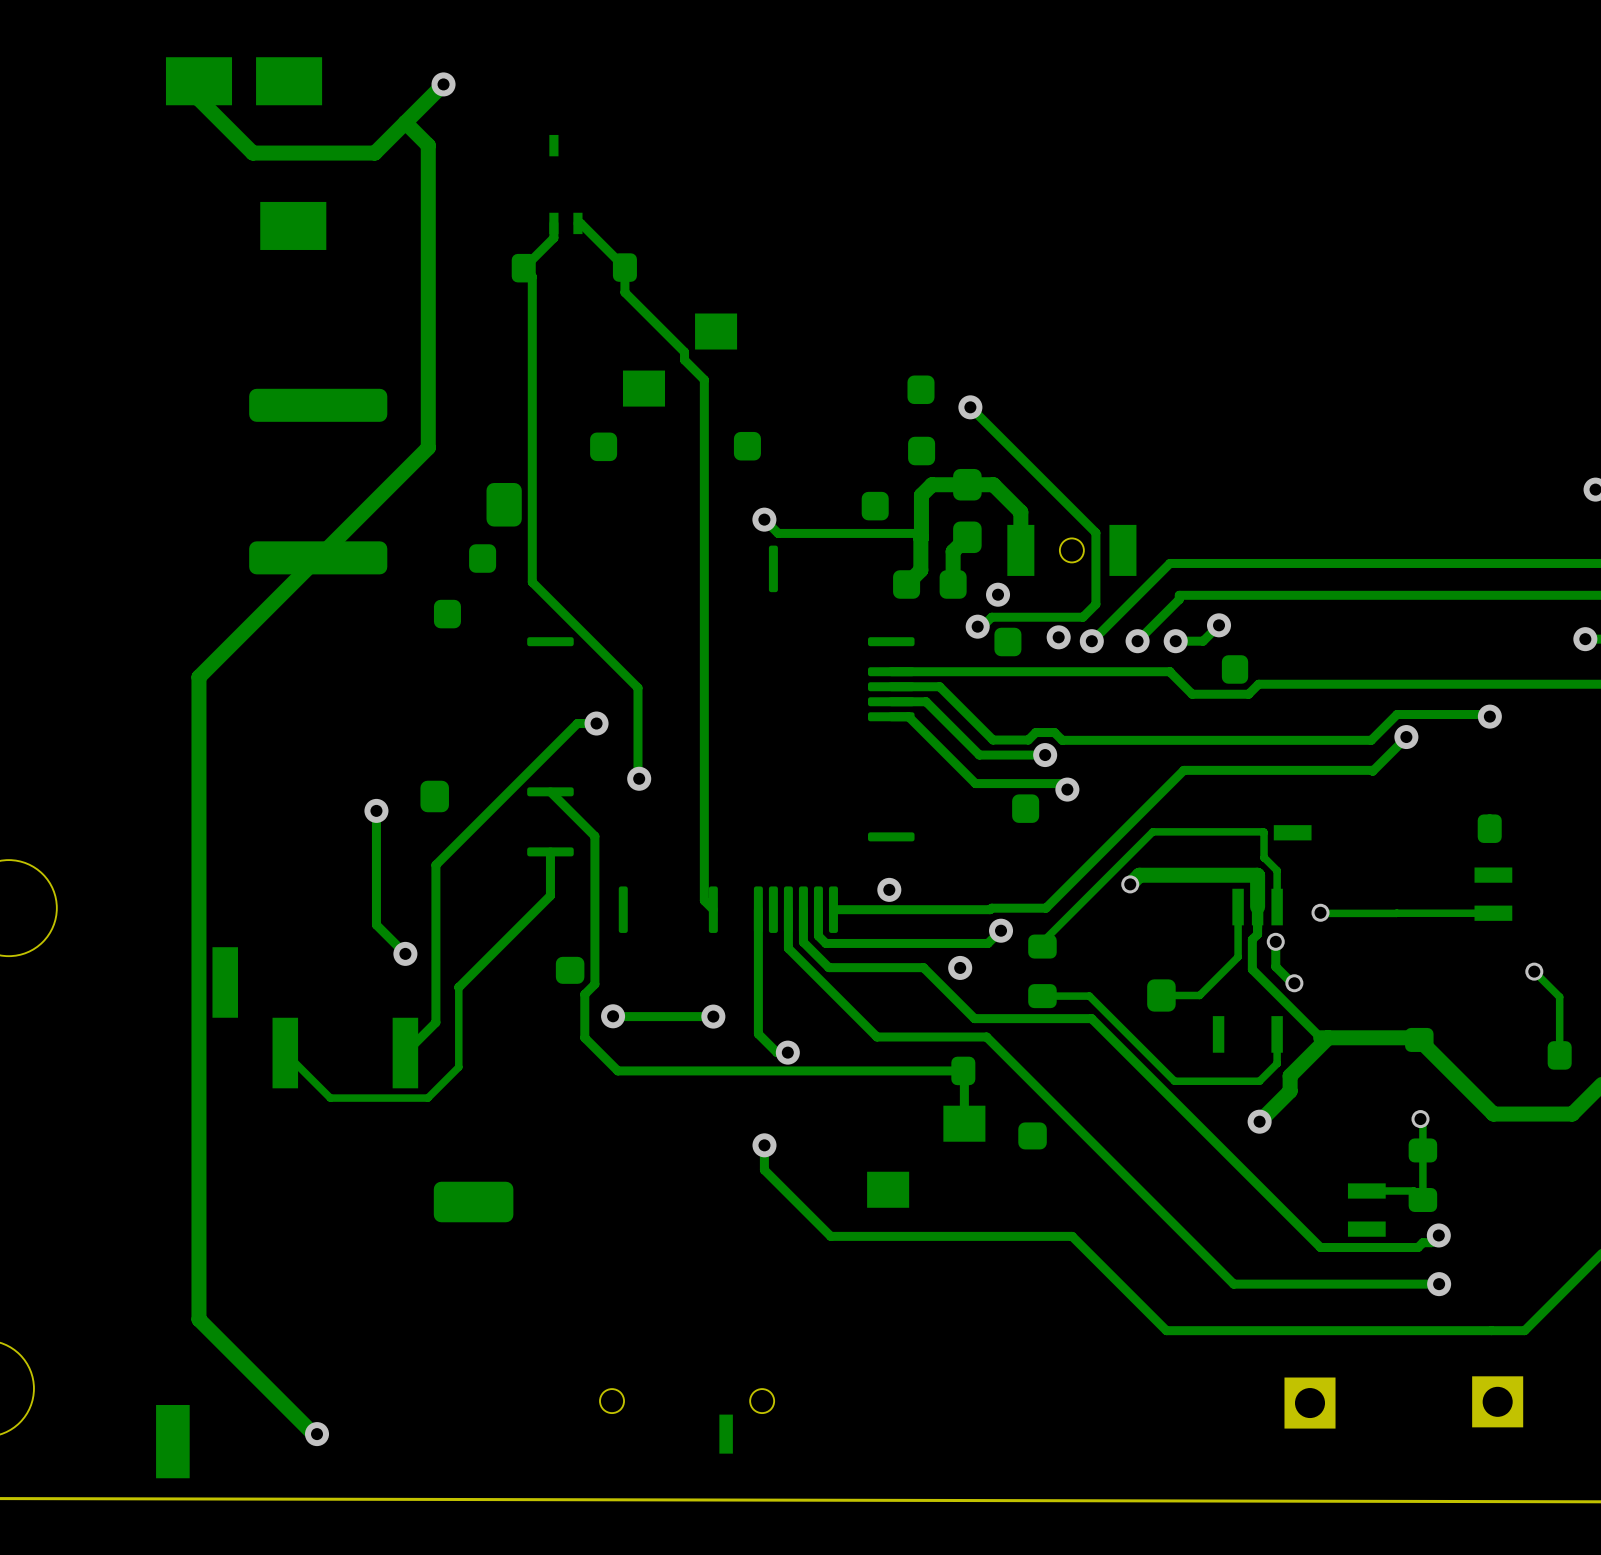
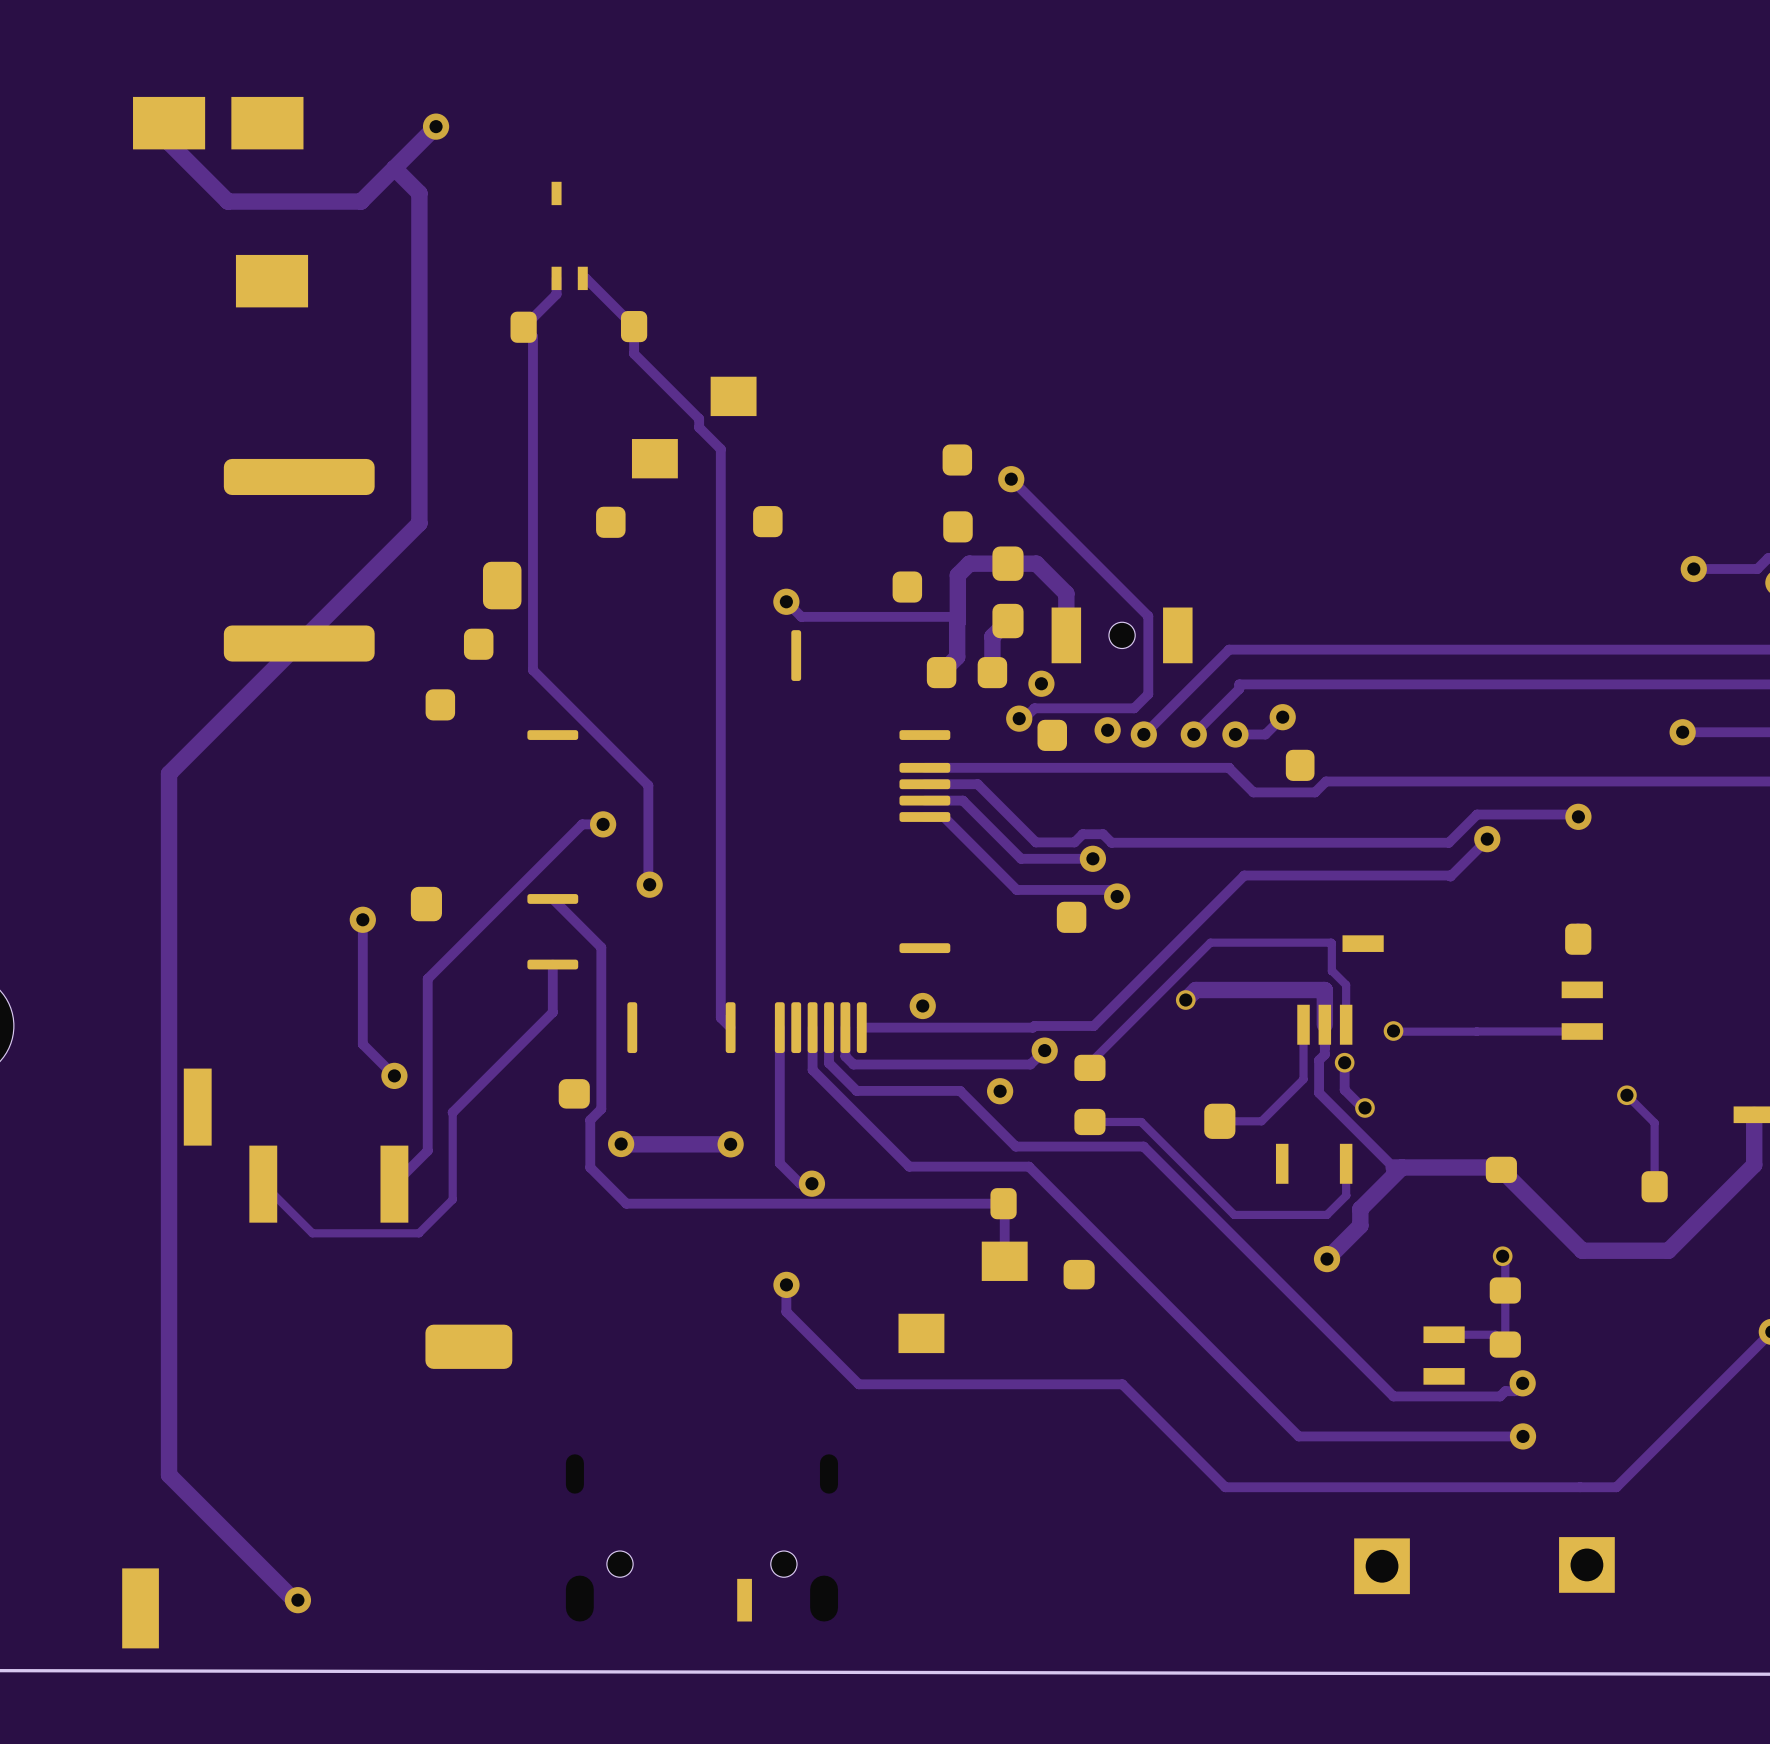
track width: thin (713, 1016) (613, 1016) -> thick (730, 1144) (621, 1144)

